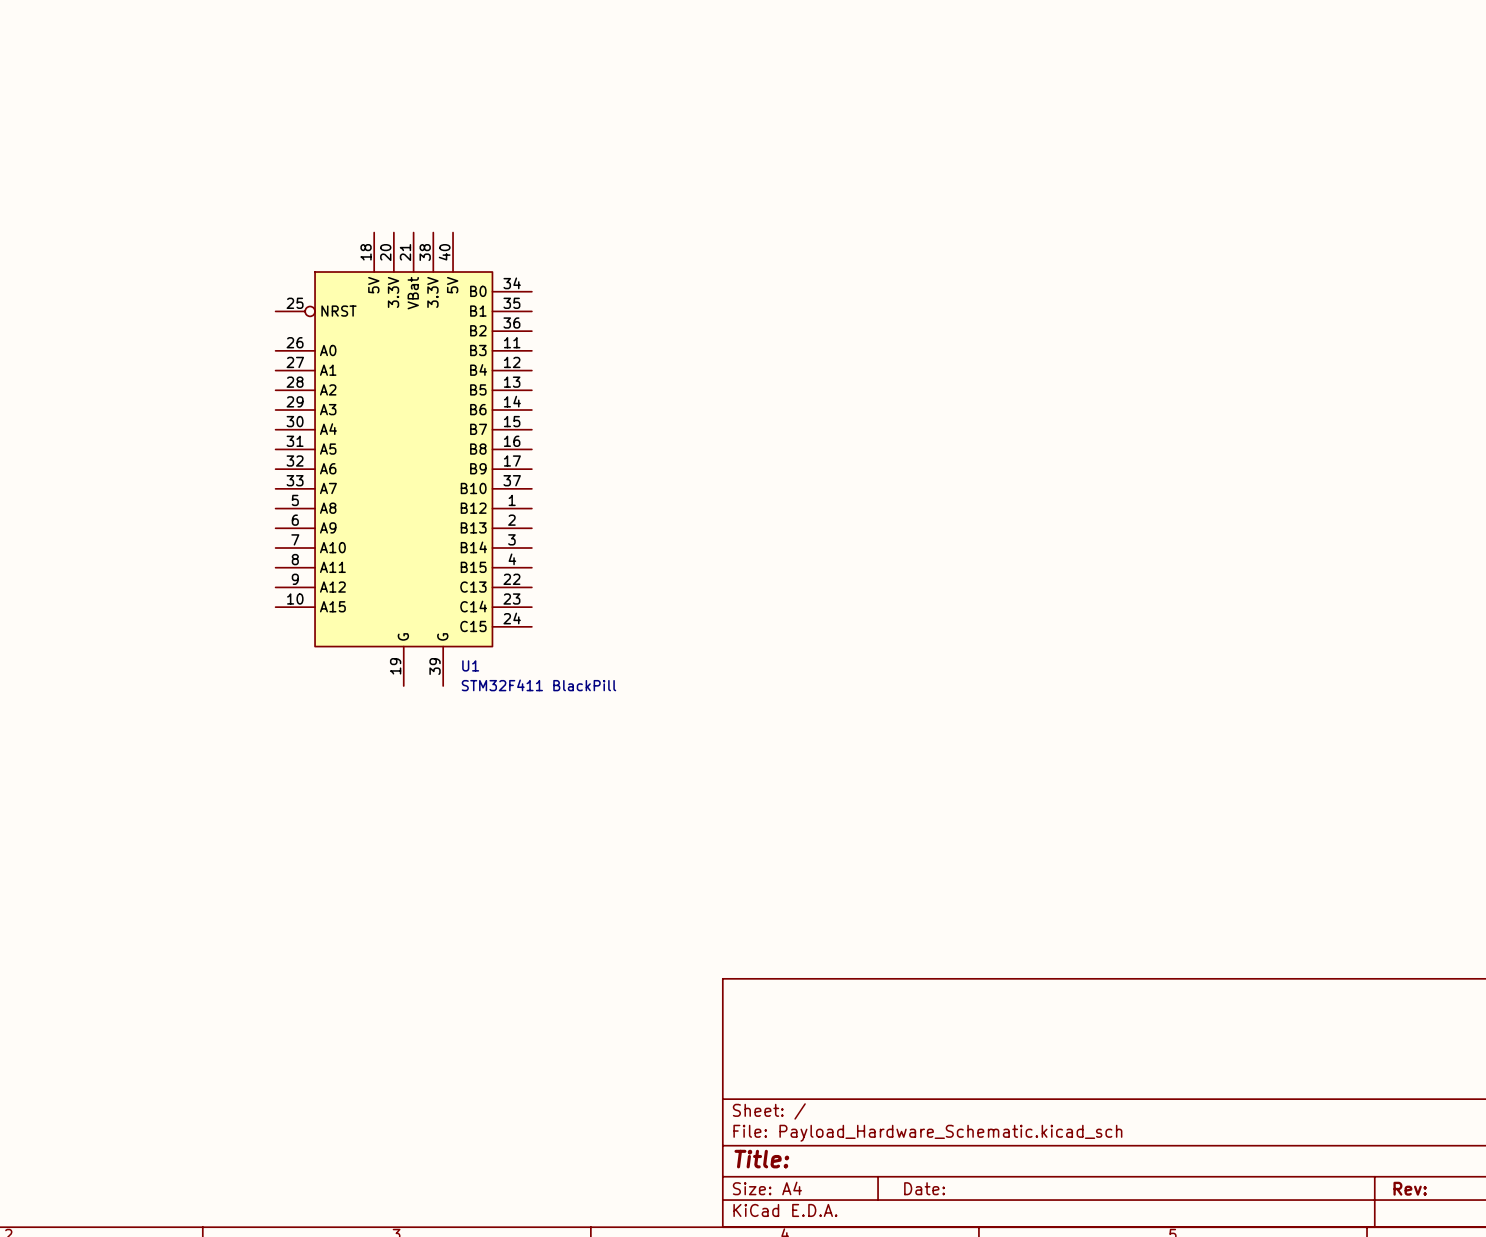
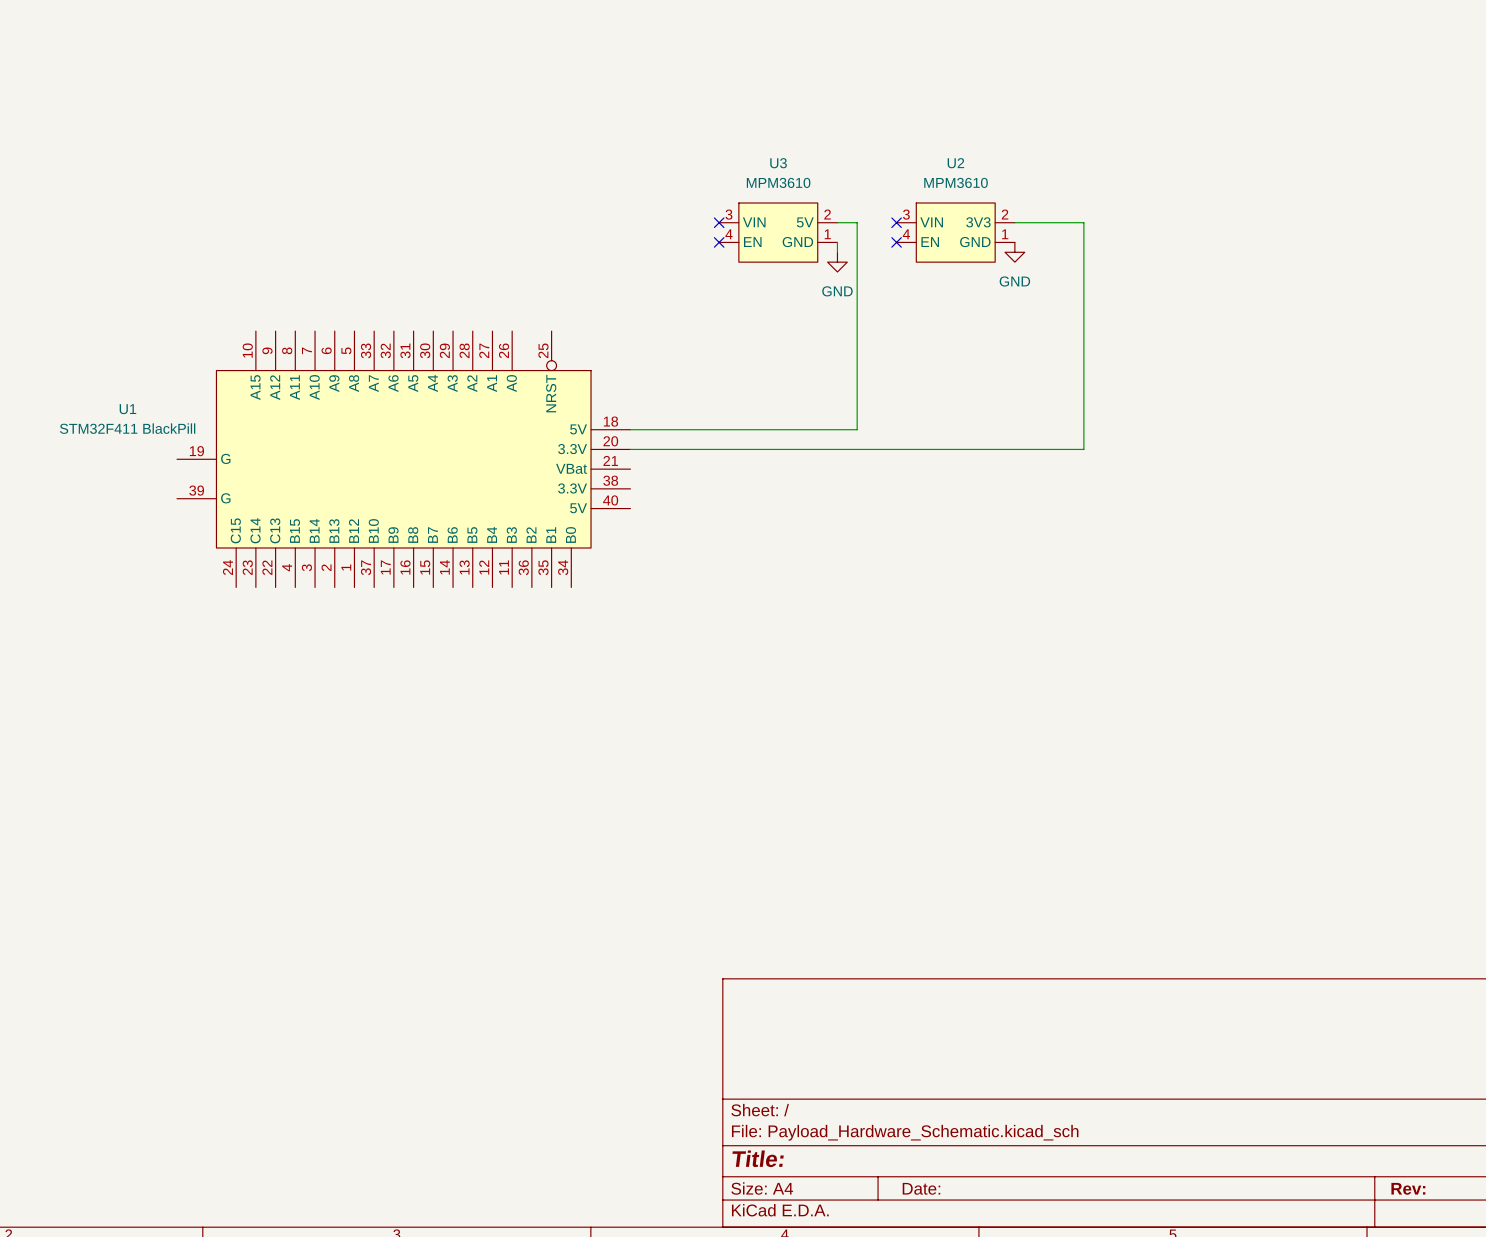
no-connect mark: none -> (719, 222)
wire: none -> (837, 222) (857, 222) (857, 429) (630, 429)
no-connect mark: none -> (896, 222)
wire: none -> (1014, 222) (1083, 222) (1083, 449) (630, 449)
U3: none -> MPM3610 (778, 232)
U2: none -> MPM3610 (955, 232)
no-connect mark: none -> (719, 242)
wire: none -> (837, 242) (837, 252)
no-connect mark: none -> (896, 242)
power symbol: none -> GND (1014, 252)
power symbol: none -> GND (837, 262)
U1 rotation: 0° (403, 459) -> 90° clockwise (403, 459)
U1 name position: U1 (470, 665) -> U1 (127, 409)
U1 value position: STM32F411 BlackPill (538, 685) -> STM32F411 BlackPill (127, 428)

